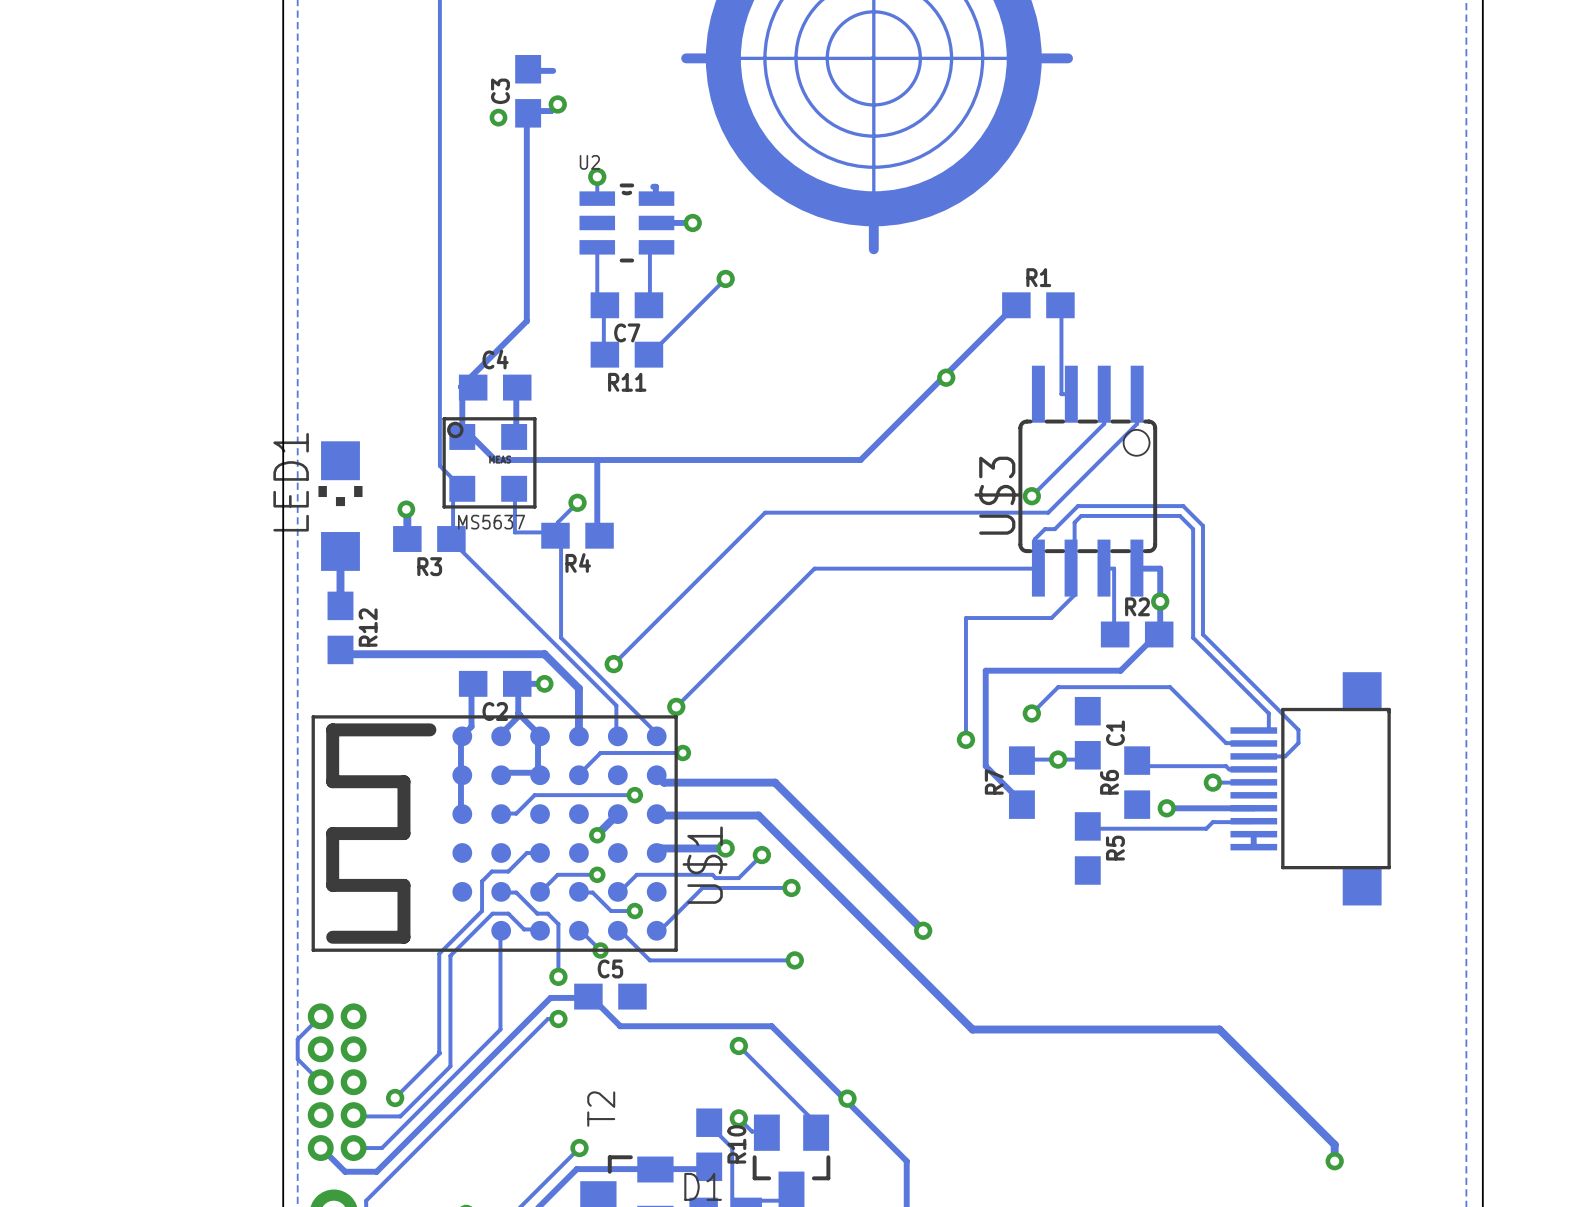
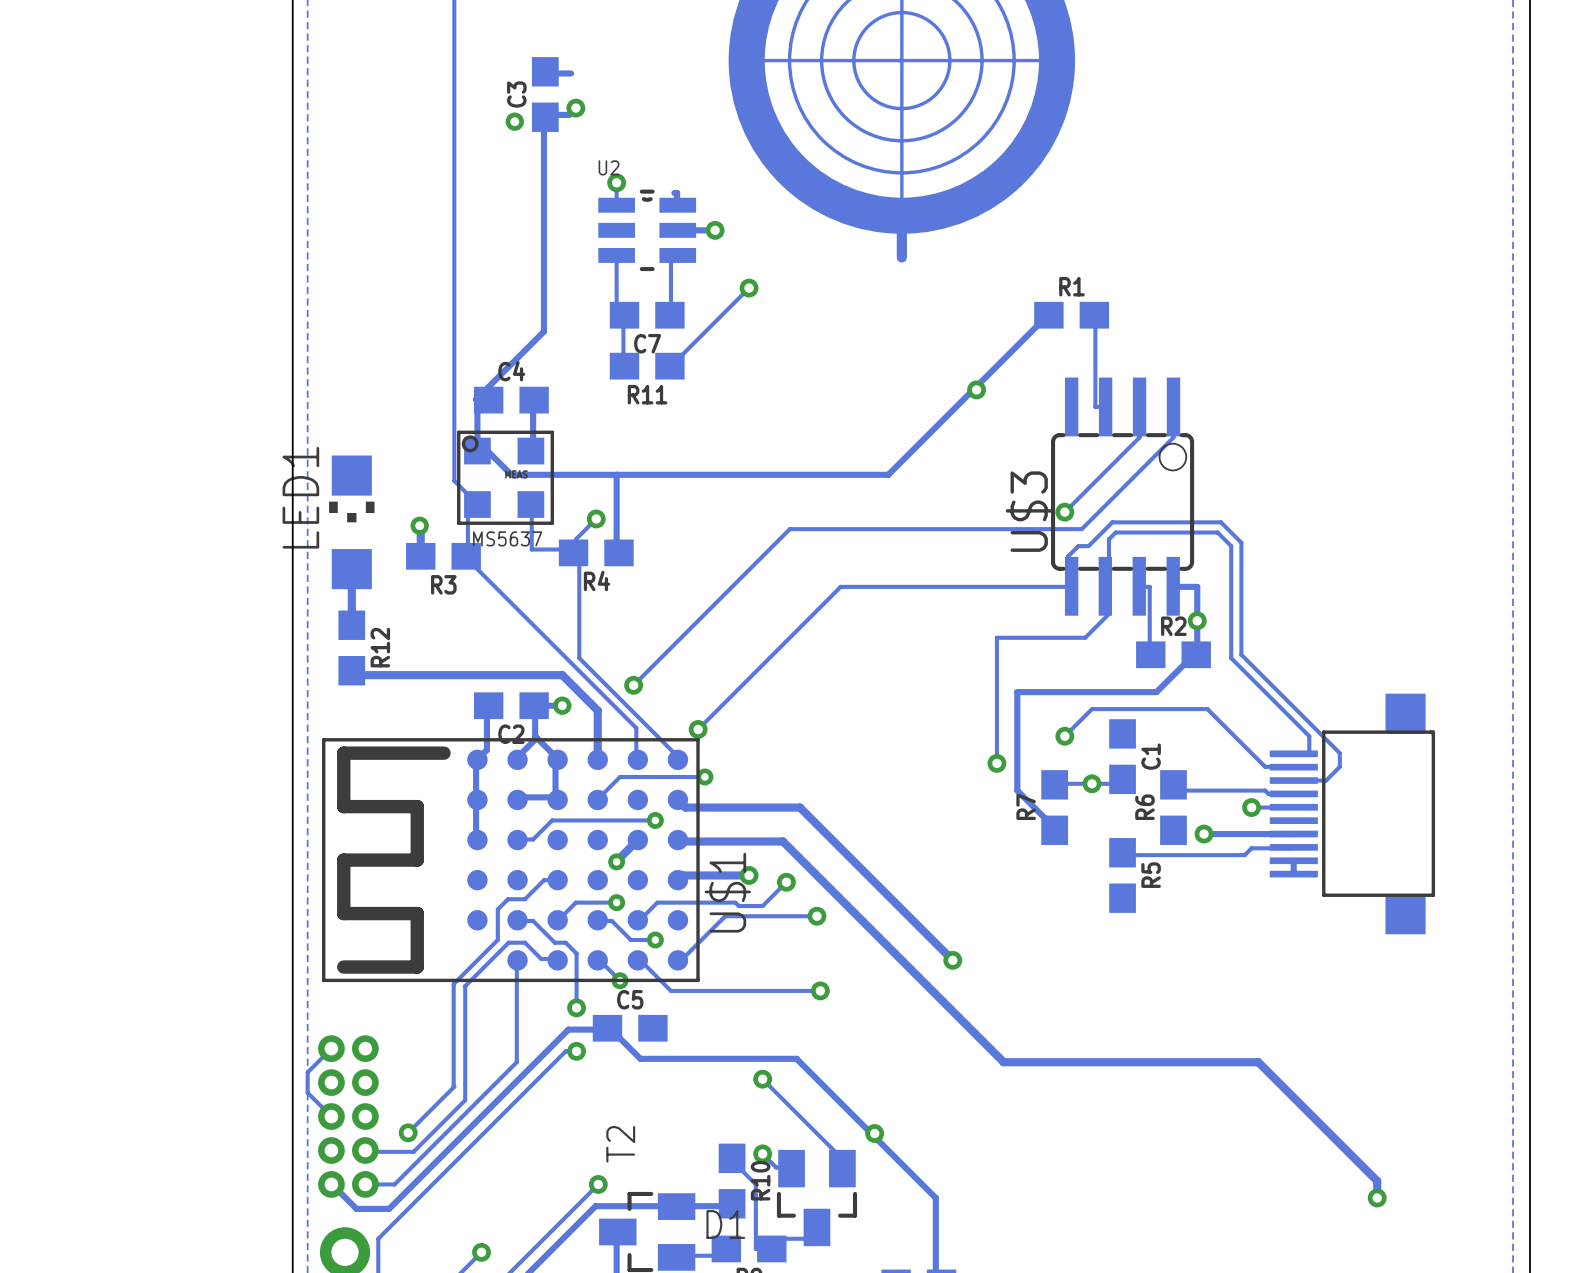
track: (719, 58) (686, 58) -> none
track: (1068, 58) (1031, 58) -> none

